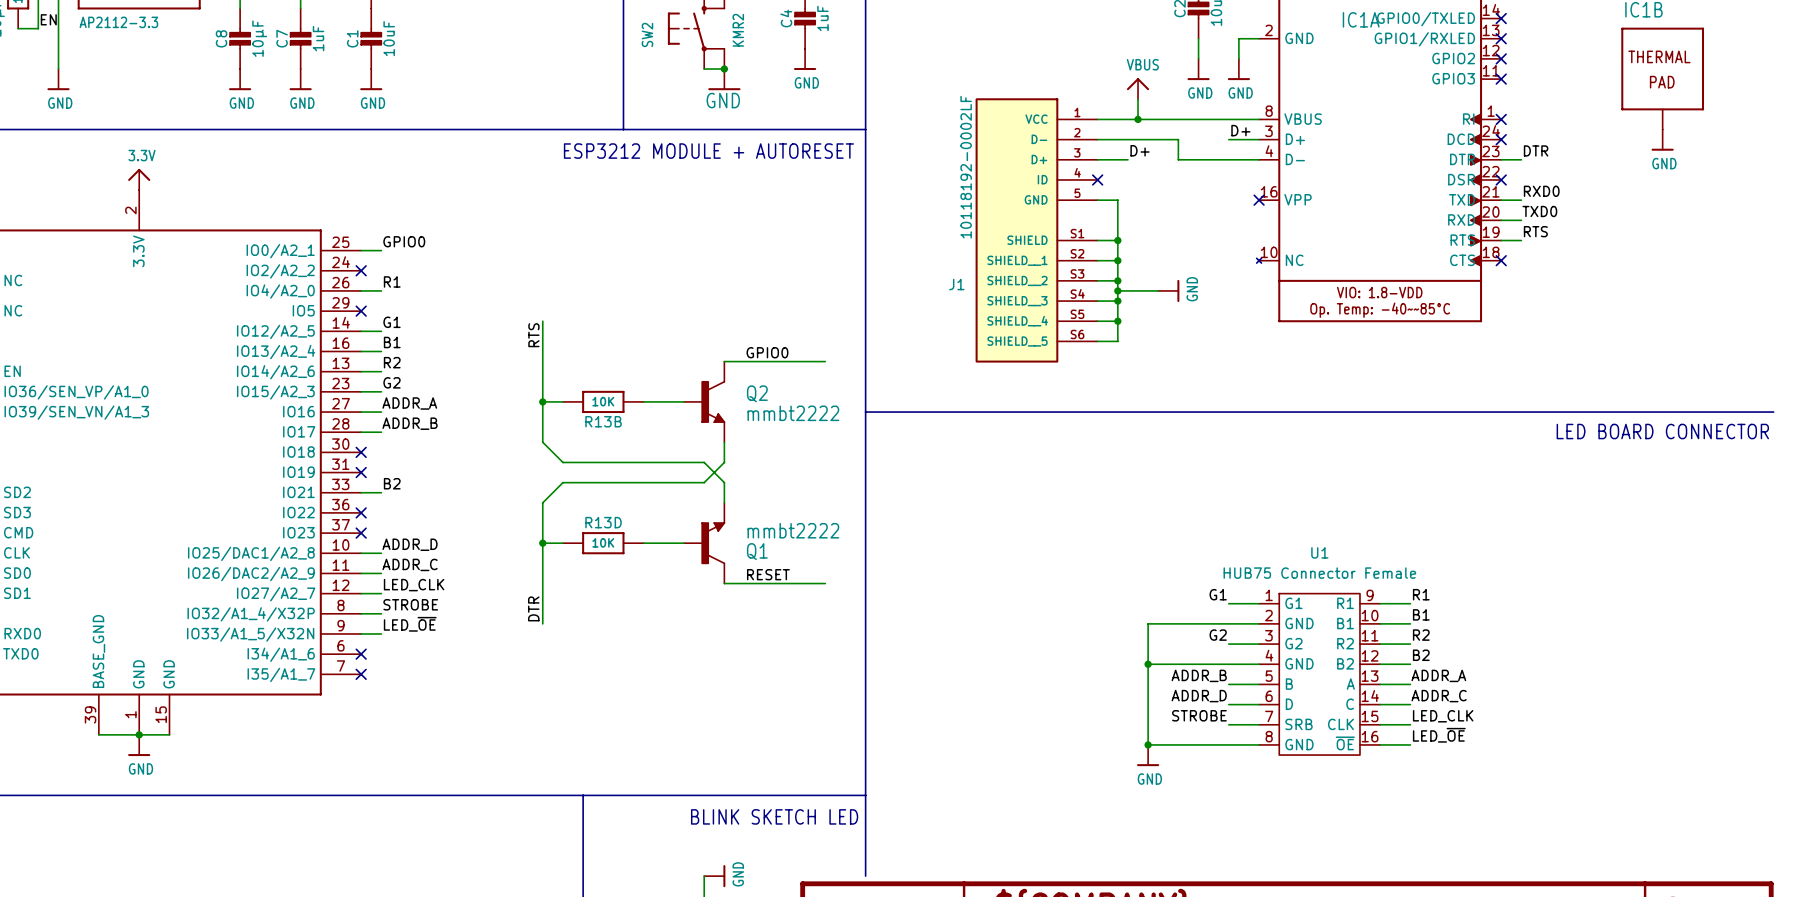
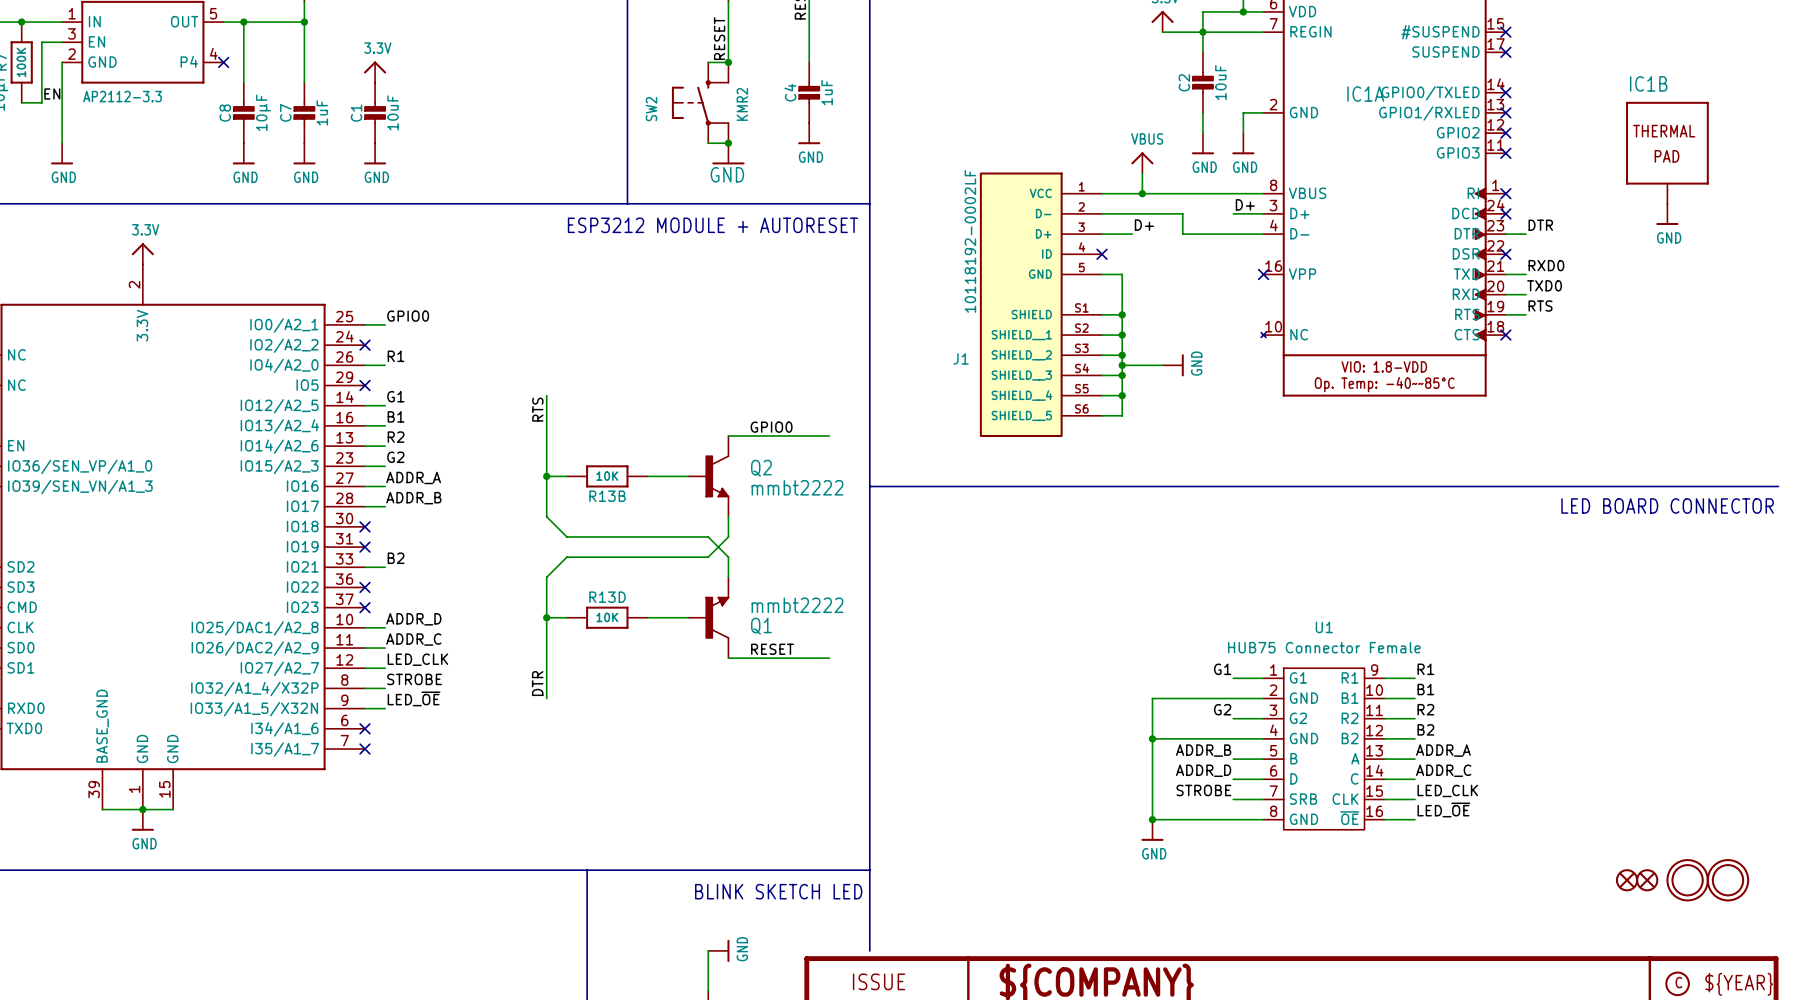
part: none -> (1627, 880)
part: none -> (1647, 880)
part: none -> (1687, 880)
part: none -> (1727, 880)

